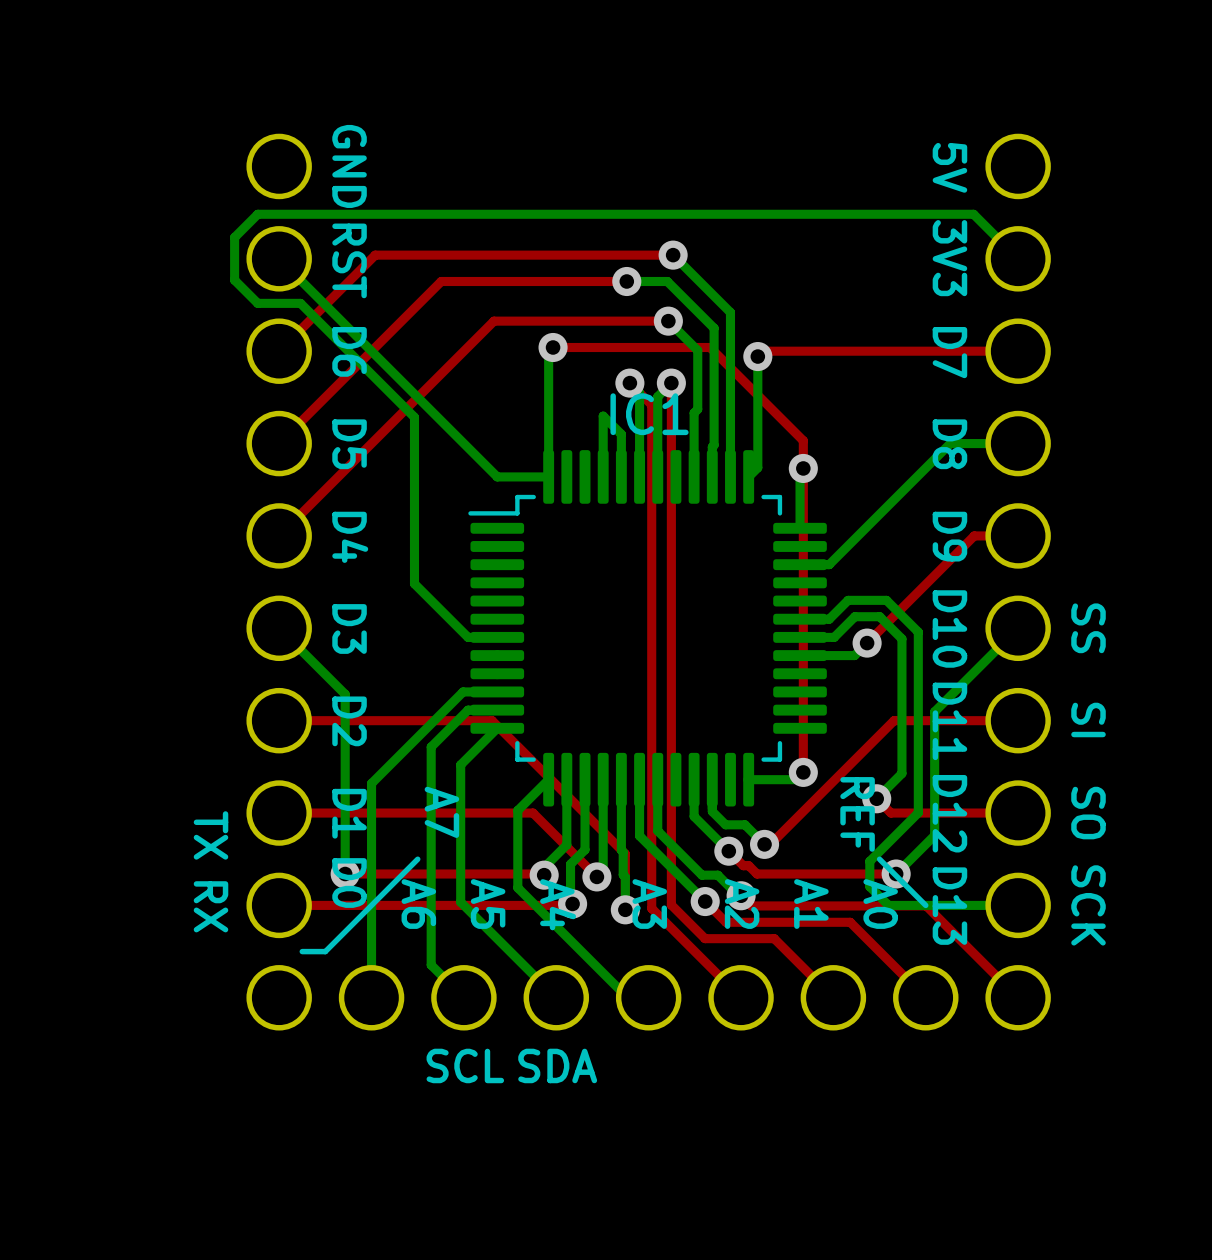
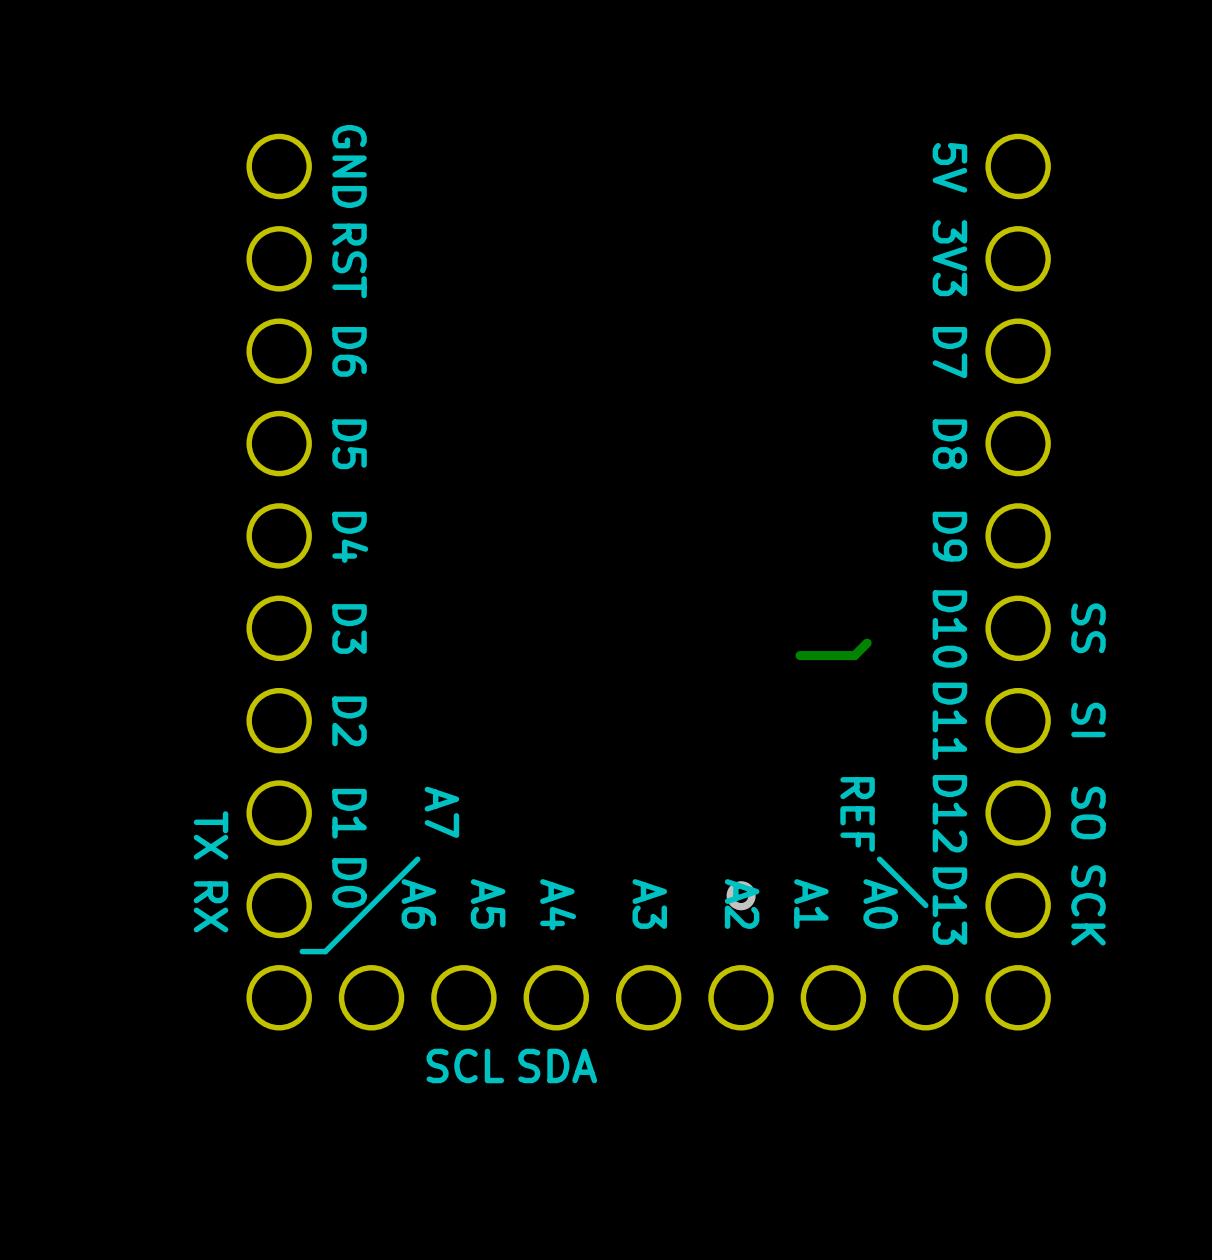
bottom track: (673, 255) (730, 312) (730, 476) -> none
top track: (673, 255) (375, 255) (279, 351) -> none
via: (673, 255) -> none
bottom track: (279, 258) (497, 476) (548, 476) (548, 351) (553, 347) -> none
bottom track: (1018, 258) (973, 214) (257, 214) (234, 237) (234, 280) (257, 303) (300, 303) (414, 417) (414, 583) (468, 637) (497, 637) -> none
bottom track: (626, 281) (667, 281) (714, 328) (712, 476) -> none
top track: (626, 281) (441, 281) (279, 443) -> none
via: (626, 281) -> none
bottom track: (668, 321) (697, 350) (697, 409) (694, 412) (694, 476) -> none
top track: (668, 321) (493, 321) (279, 535) -> none
via: (668, 321) -> none
top track: (553, 347) (710, 347) (803, 440) (803, 772) -> none
via: (553, 347) -> none
top track: (1018, 351) (763, 351) (757, 356) -> none
bottom track: (757, 356) (757, 467) (748, 476) -> none
via: (757, 356) -> none
bottom track: (629, 383) (639, 392) (639, 476) -> none
top track: (629, 383) (651, 404) (651, 908) (741, 997) -> none
via: (629, 383) -> none
bottom track: (671, 383) (657, 396) (657, 476) -> none
top track: (671, 383) (671, 904) (705, 938) (774, 938) (833, 997) -> none
via: (671, 383) -> none
bottom track: (1018, 443) (950, 443) (829, 564) (800, 564) -> none
bottom track: (803, 468) (800, 471) (800, 528) -> none
via: (803, 468) -> none
bottom track: (621, 476) (621, 434) (603, 416) (603, 476) -> none
top track: (1018, 535) (974, 535) (867, 643) -> none
bottom track: (800, 619) (829, 619) (848, 600) (886, 600) (918, 632) (918, 812) (869, 861) (869, 886) (888, 905) (1018, 905) -> none
bottom track: (279, 628) (345, 694) (345, 874) -> none
IC1: (647, 628) -> none
bottom track: (1018, 628) (934, 711) (934, 835) (896, 874) -> none
bottom track: (800, 637) (834, 637) (854, 616) (879, 616) (901, 638) (901, 773) (876, 798) -> none
via: (867, 643) -> none
bottom track: (497, 691) (463, 691) (371, 783) (371, 997) -> none
bottom track: (497, 710) (468, 710) (431, 747) (431, 965) (463, 997) -> none
top track: (279, 720) (492, 720) (625, 853) (625, 909) -> none
top track: (1018, 720) (894, 720) (770, 844) (764, 844) -> none
bottom track: (497, 728) (460, 764) (460, 902) (556, 997) -> none
bottom track: (802, 772) (796, 779) (747, 779) -> none
via: (803, 772) -> none
bottom track: (548, 779) (517, 810) (517, 887) (627, 997) (648, 997) -> none
bottom track: (566, 779) (566, 844) (544, 867) (544, 875) -> none
bottom track: (585, 779) (585, 849) (570, 864) (570, 901) (572, 903) -> none
bottom track: (603, 779) (603, 870) (596, 876) -> none
bottom track: (621, 779) (621, 850) (623, 852) (623, 874) (625, 877) (625, 909) -> none
bottom track: (639, 779) (639, 835) (705, 901) -> none
bottom track: (657, 779) (657, 830) (701, 875) (717, 875) (738, 895) (741, 895) -> none
bottom track: (694, 779) (694, 816) (728, 851) -> none
bottom track: (712, 779) (712, 811) (725, 824) (744, 824) (764, 844) -> none
top track: (876, 798) (891, 813) (1018, 813) -> none
via: (876, 798) -> none
top track: (279, 813) (533, 813) (596, 876) -> none
via: (764, 844) -> none
top track: (728, 851) (743, 865) (748, 865) (757, 874) (896, 874) -> none
via: (728, 851) -> none
top track: (345, 874) (544, 875) -> none
via: (345, 874) -> none
via: (896, 874) -> none
via: (544, 875) -> none
via: (596, 876) -> none
top track: (741, 895) (751, 905) (926, 905) (1018, 997) -> none
top track: (705, 901) (725, 922) (850, 922) (925, 997) -> none
via: (705, 901) -> none
top track: (572, 903) (279, 905) -> none
via: (572, 903) -> none
via: (625, 909) -> none

